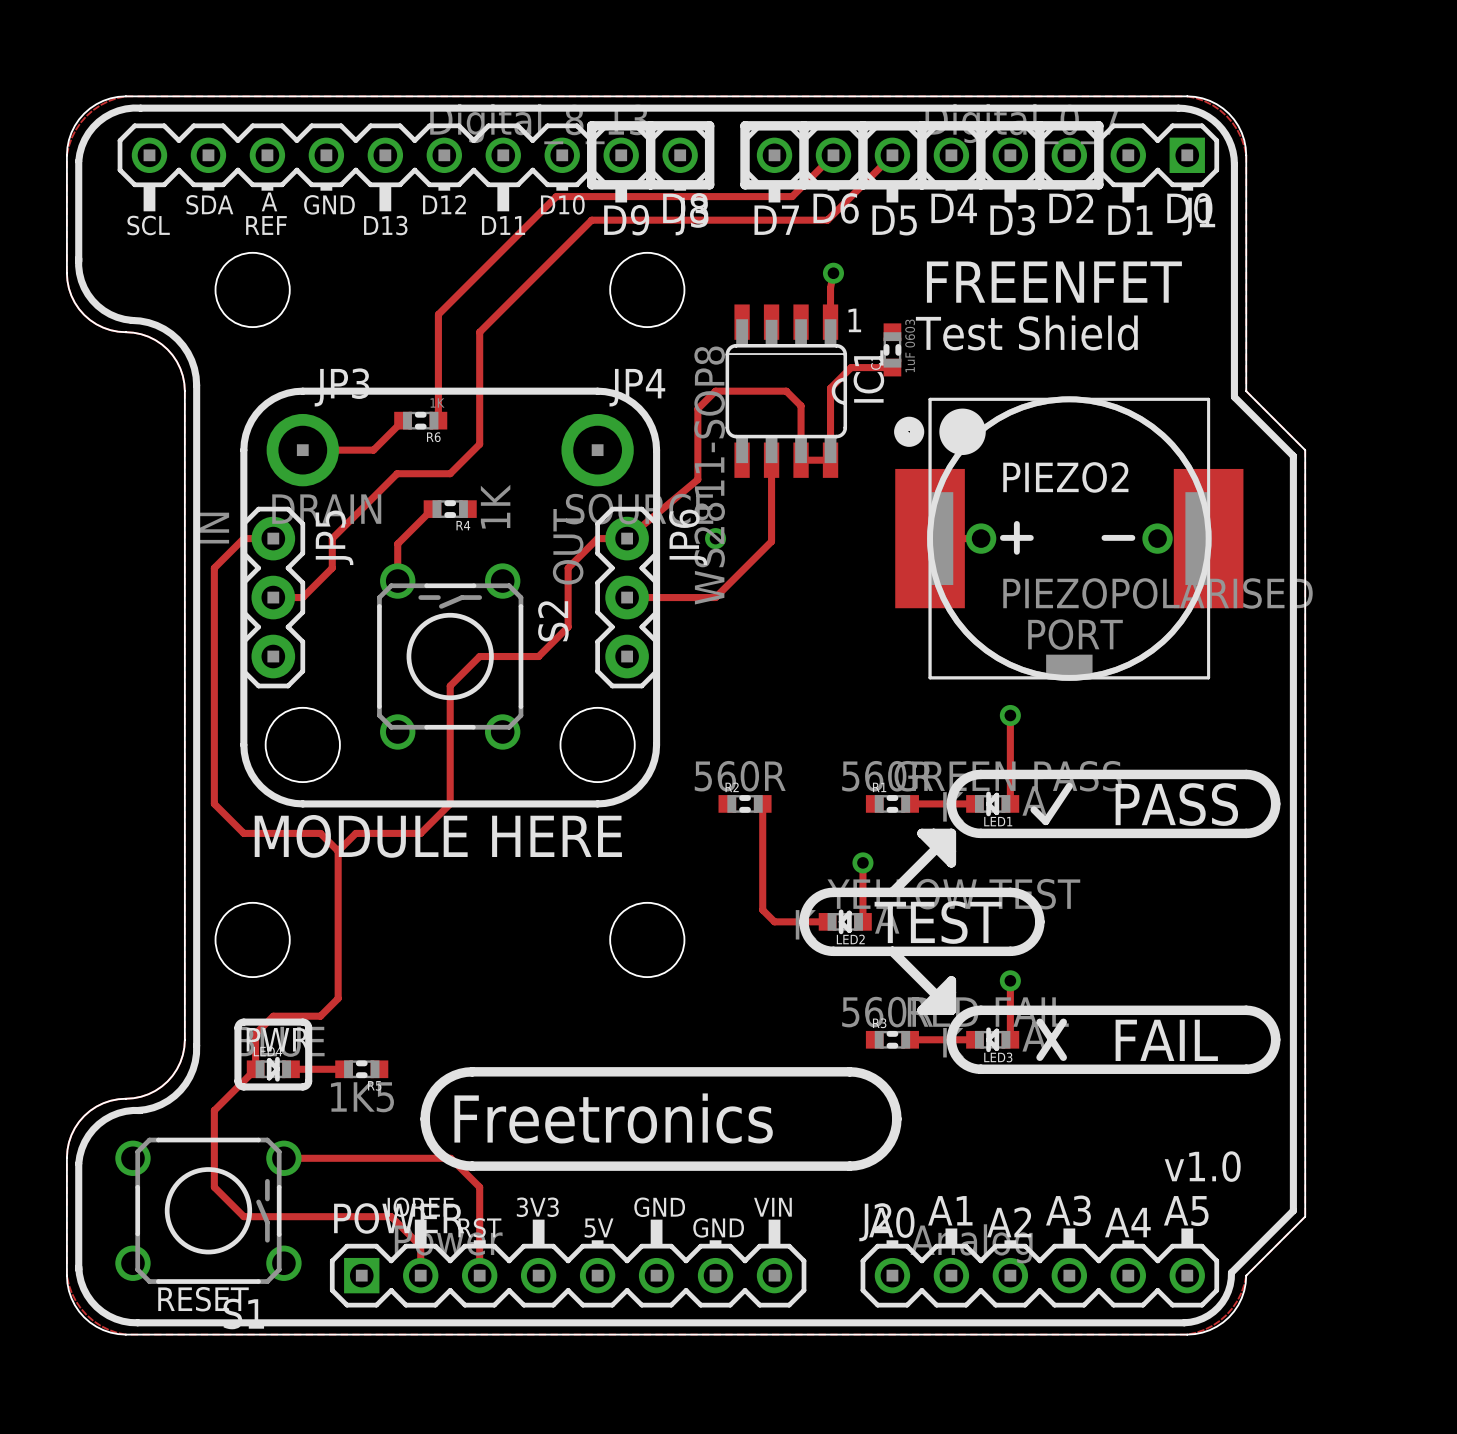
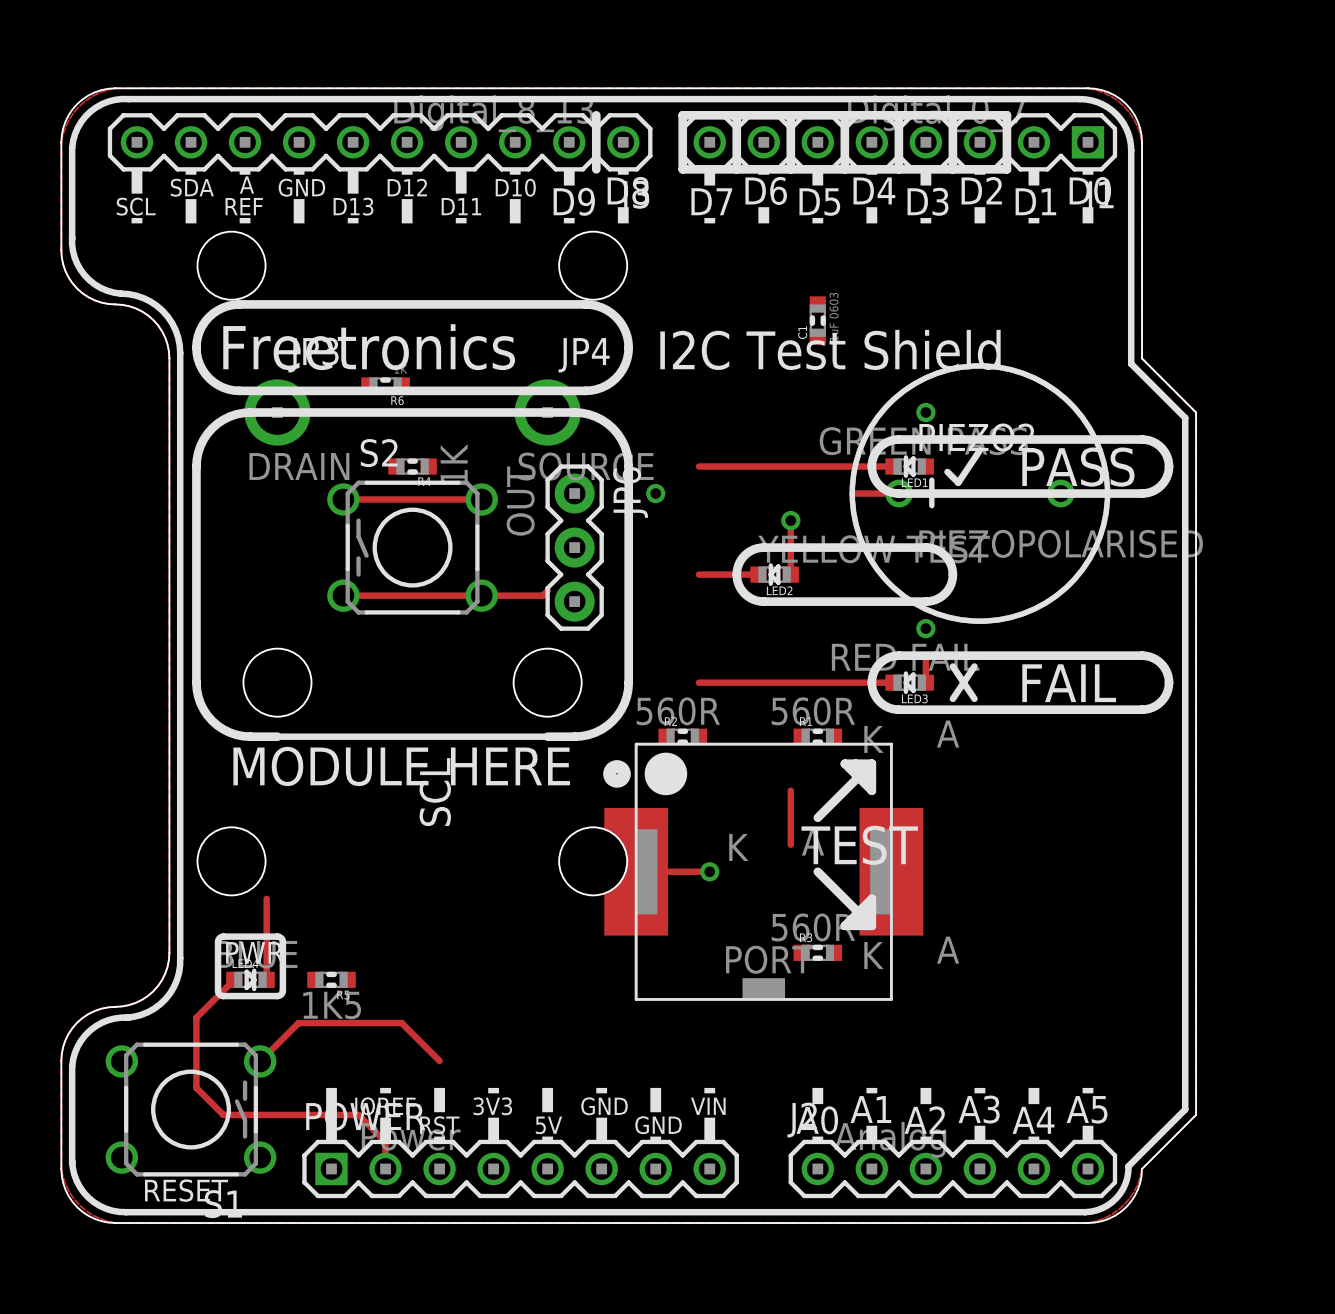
line: (591, 125) (709, 125) (709, 184) (591, 184) (591, 125) -> none
track: (833, 155) (792, 196) (556, 196) (438, 314) (438, 420) -> none
track: (892, 155) (827, 220) (591, 220) (479, 332) (479, 444) (450, 473) (397, 473) (332, 538) (332, 568) (302, 597) (273, 597) -> none
drawing: none -> [185, 199, 197, 224]
drawing: none -> [293, 199, 305, 224]
drawing: none -> [401, 199, 413, 224]
drawing: none -> [509, 199, 521, 224]
drawing: none -> [617, 207, 629, 224]
drawing: none -> [758, 207, 770, 224]
drawing: none -> [866, 207, 878, 224]
drawing: none -> [974, 207, 986, 224]
drawing: none -> [1082, 207, 1094, 224]
drawing: none -> [131, 217, 143, 224]
drawing: none -> [239, 217, 251, 224]
drawing: none -> [347, 217, 359, 224]
drawing: none -> [455, 217, 467, 224]
drawing: none -> [563, 217, 575, 224]
drawing: none -> [704, 217, 716, 224]
drawing: none -> [812, 217, 824, 224]
drawing: none -> [920, 217, 932, 224]
drawing: none -> [1028, 217, 1040, 224]
track: (833, 273) (830, 287) (830, 322) -> none
via: (833, 273) -> none
text: FREENFET (1054, 282) -> none
text: 1 (854, 320) -> none
line: none -> (239, 304) (591, 304) (607, 310) (619, 321) (627, 336) (628, 353) (622, 369) (616, 378) (607, 385) (591, 390) (234, 390) (218, 385) (205, 373) (197, 358) (196, 347) (199, 331) (209, 317) (223, 307) (239, 304)
text: Test Shield (1026, 333) -> I2C Test Shield (830, 349)
track: (892, 367) (851, 367) (830, 388) (830, 460) (801, 460) (801, 405) (786, 391) (715, 391) (697, 408) (697, 479) (627, 538) (597, 538) (568, 568) (568, 627) (538, 656) (479, 656) (450, 685) (450, 803) (420, 833) (355, 833) (338, 851) -> none
text: none -> Freetronics (369, 347)
IC1: WS2811-SOP8 (786, 391) -> none
track: (403, 420) (373, 450) (302, 450) -> none
via: none -> (925, 412)
track: (771, 460) (771, 541) (715, 597) (627, 597) -> none
track: (432, 509) (397, 543) (397, 581) -> none
track: none -> (698, 466) (893, 466)
track: (273, 538) (243, 538) (214, 568) (214, 803) (243, 833) (320, 833) (338, 851) -> none
part position: (1068, 538) -> (763, 871)
track: none -> (343, 499) (481, 499)
via: none -> (790, 520)
JP5: IN (273, 597) -> none
track: none -> (547, 590) (542, 595) (343, 595)
S2 rotation: 0° (450, 656) -> 90° counterclockwise (412, 547)
via position: (1010, 715) -> (925, 628)
track: none -> (698, 682) (893, 682)
track: (1010, 744) (1010, 803) -> (790, 520) (790, 574)
line: (980, 774) (969, 776) (960, 783) (953, 792) (951, 803) (953, 815) (960, 824) (969, 831) (980, 833) (1253, 832) (1264, 827) (1271, 818) (1275, 807) (1275, 800) (1271, 789) (1264, 780) (1253, 775) (1246, 774) -> (898, 709) (888, 707) (879, 701) (873, 693) (871, 682) (873, 672) (879, 663) (888, 657) (898, 655) (1149, 656) (1158, 661) (1165, 669) (1168, 686) (1165, 696) (1158, 704) (1142, 709)
line: (1069, 786) (1045, 821) (1033, 809) -> (979, 450) (958, 482) (947, 471)
line: (302, 803) (280, 799) (261, 786) (248, 767) (243, 744) (244, 442) (248, 427) (261, 408) (280, 395) (302, 391) (605, 391) (627, 399) (644, 414) (654, 434) (656, 450) (656, 752) (652, 767) (639, 786) (620, 799) (597, 803) -> (277, 736) (243, 736) (223, 729) (207, 715) (200, 703) (196, 689) (196, 459) (200, 445) (212, 428) (229, 416) (243, 412) (574, 412) (595, 416) (612, 428) (624, 445) (628, 466) (628, 682) (626, 696) (617, 715) (601, 729) (581, 736) (547, 736)
track: (762, 803) (762, 910) (774, 921) (827, 921) -> none
track: (910, 803) (974, 803) -> (698, 574) (758, 574)
LED1 position: (992, 803) -> (909, 466)
text position: PASS (1176, 804) -> PASS (1078, 467)
track: (338, 851) (338, 998) (320, 1016) (273, 1016) (255, 1033) (255, 1069) -> none
via: (862, 862) -> none
text: none -> SCL (435, 792)
line: (833, 892) (1014, 892) (1025, 896) (1033, 903) (1038, 914) (1039, 925) (1035, 936) (1031, 942) (1025, 947) (1014, 951) (829, 951) (818, 947) (810, 939) (805, 929) (803, 921) (806, 910) (812, 901) (822, 894) (833, 892) -> (763, 547) (929, 547) (939, 551) (947, 558) (951, 567) (952, 578) (944, 593) (929, 601) (760, 601) (750, 598) (742, 591) (736, 574) (738, 564) (744, 555) (753, 549) (763, 547)
LED2 position: (845, 921) -> (774, 574)
track: none -> (636, 871) (709, 871)
via: none -> (709, 871)
track: (1010, 980) (1010, 1039) -> none
via: (1010, 980) -> none
line: (980, 1010) (1250, 1010) (1260, 1014) (1269, 1021) (1274, 1032) (1275, 1043) (1271, 1054) (1267, 1060) (1260, 1065) (1250, 1069) (977, 1069) (966, 1065) (957, 1057) (952, 1047) (951, 1039) (953, 1028) (960, 1018) (969, 1012) (980, 1010) -> (898, 439) (1145, 439) (1155, 443) (1163, 450) (1168, 459) (1168, 470) (1161, 485) (1145, 493) (895, 493) (885, 489) (877, 482) (871, 466) (873, 456) (879, 447) (888, 441) (898, 439)
line: (1039, 1022) (1063, 1057) -> (952, 666) (974, 698)
line: (1063, 1022) (1039, 1057) -> (974, 666) (952, 698)
track: (910, 1039) (974, 1039) -> none
LED3 position: (992, 1039) -> (909, 682)
text position: FAIL (1166, 1040) -> FAIL (1069, 683)
track: (291, 1069) (344, 1069) -> (266, 979) (266, 898)
line: (472, 1071) (855, 1072) (873, 1078) (887, 1090) (895, 1106) (896, 1125) (890, 1142) (883, 1152) (873, 1159) (855, 1165) (466, 1165) (448, 1159) (434, 1147) (426, 1131) (425, 1118) (428, 1100) (438, 1085) (454, 1075) (472, 1071) -> none
text: Freetronics (613, 1118) -> none
track: (283, 1158) (450, 1158) (479, 1187) (479, 1275) -> (260, 1061) (298, 1023) (401, 1023) (439, 1060)
text: v1.0 (1202, 1166) -> none
drawing: none -> [326, 1087, 337, 1142]
drawing: none -> [380, 1087, 391, 1094]
drawing: none -> [434, 1087, 445, 1113]
drawing: none -> [488, 1087, 500, 1094]
drawing: none -> [542, 1087, 554, 1113]
drawing: none -> [596, 1087, 608, 1094]
drawing: none -> [650, 1087, 662, 1113]
drawing: none -> [704, 1087, 716, 1094]
drawing: none -> [812, 1087, 824, 1105]
drawing: none -> [866, 1087, 878, 1094]
drawing: none -> [920, 1087, 932, 1105]
drawing: none -> [974, 1087, 986, 1094]
drawing: none -> [1028, 1087, 1040, 1105]
drawing: none -> [1082, 1087, 1094, 1094]

